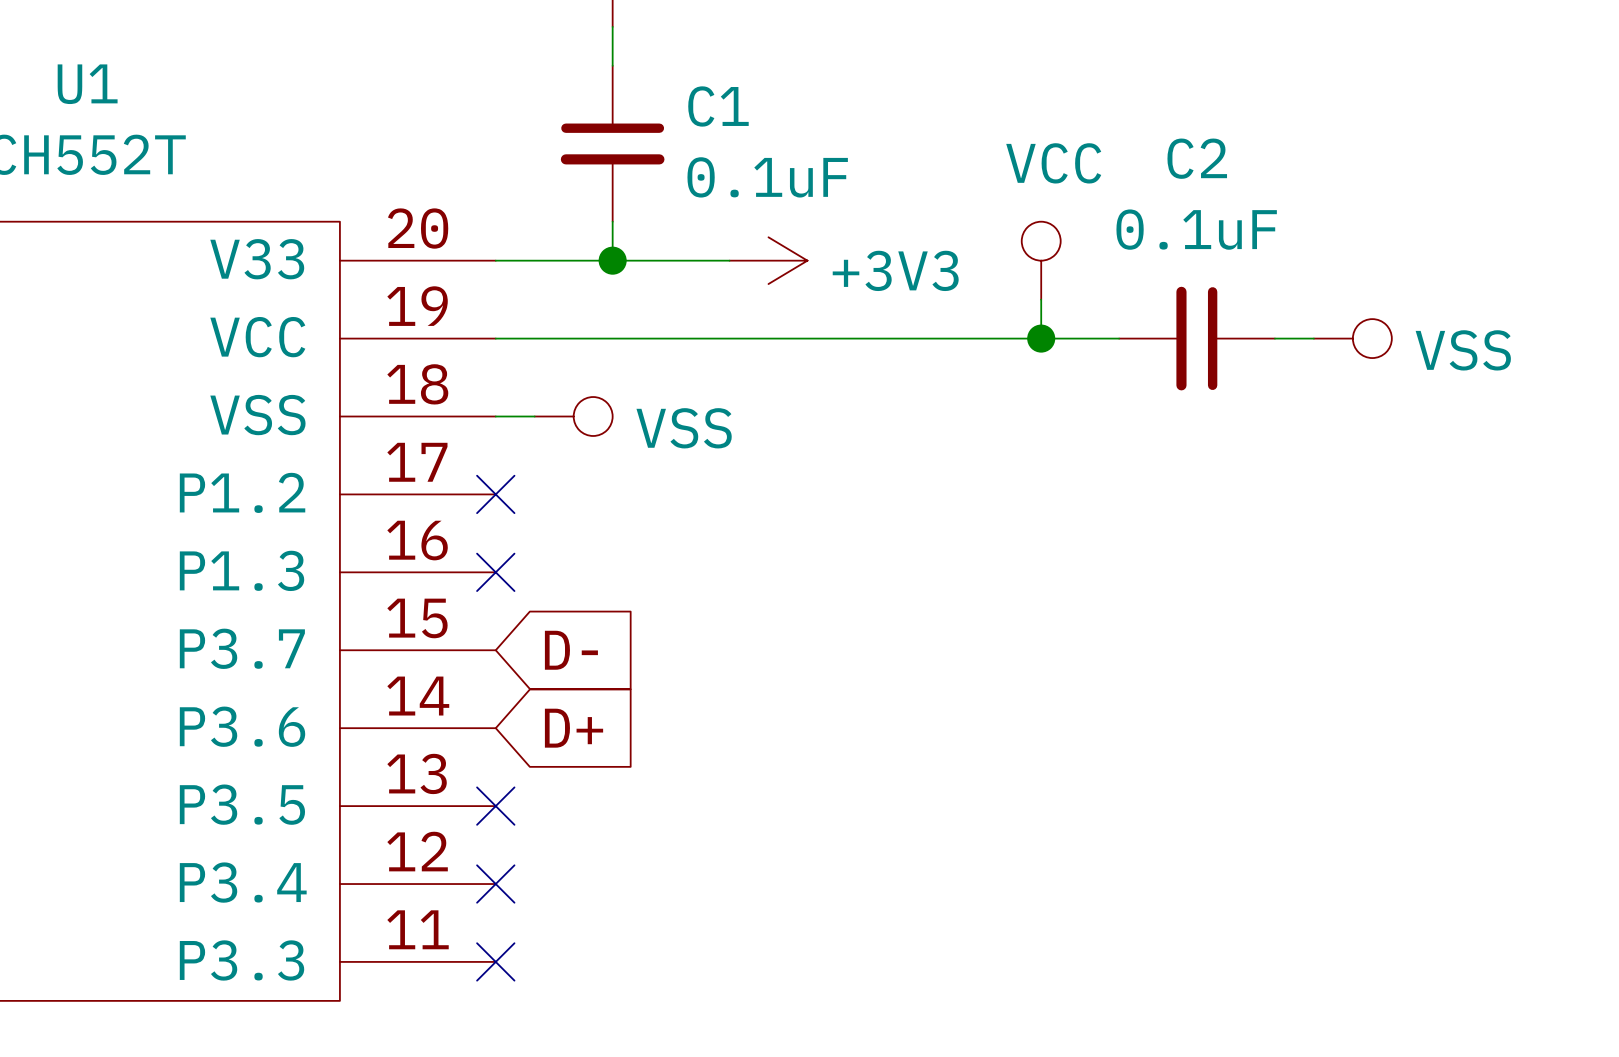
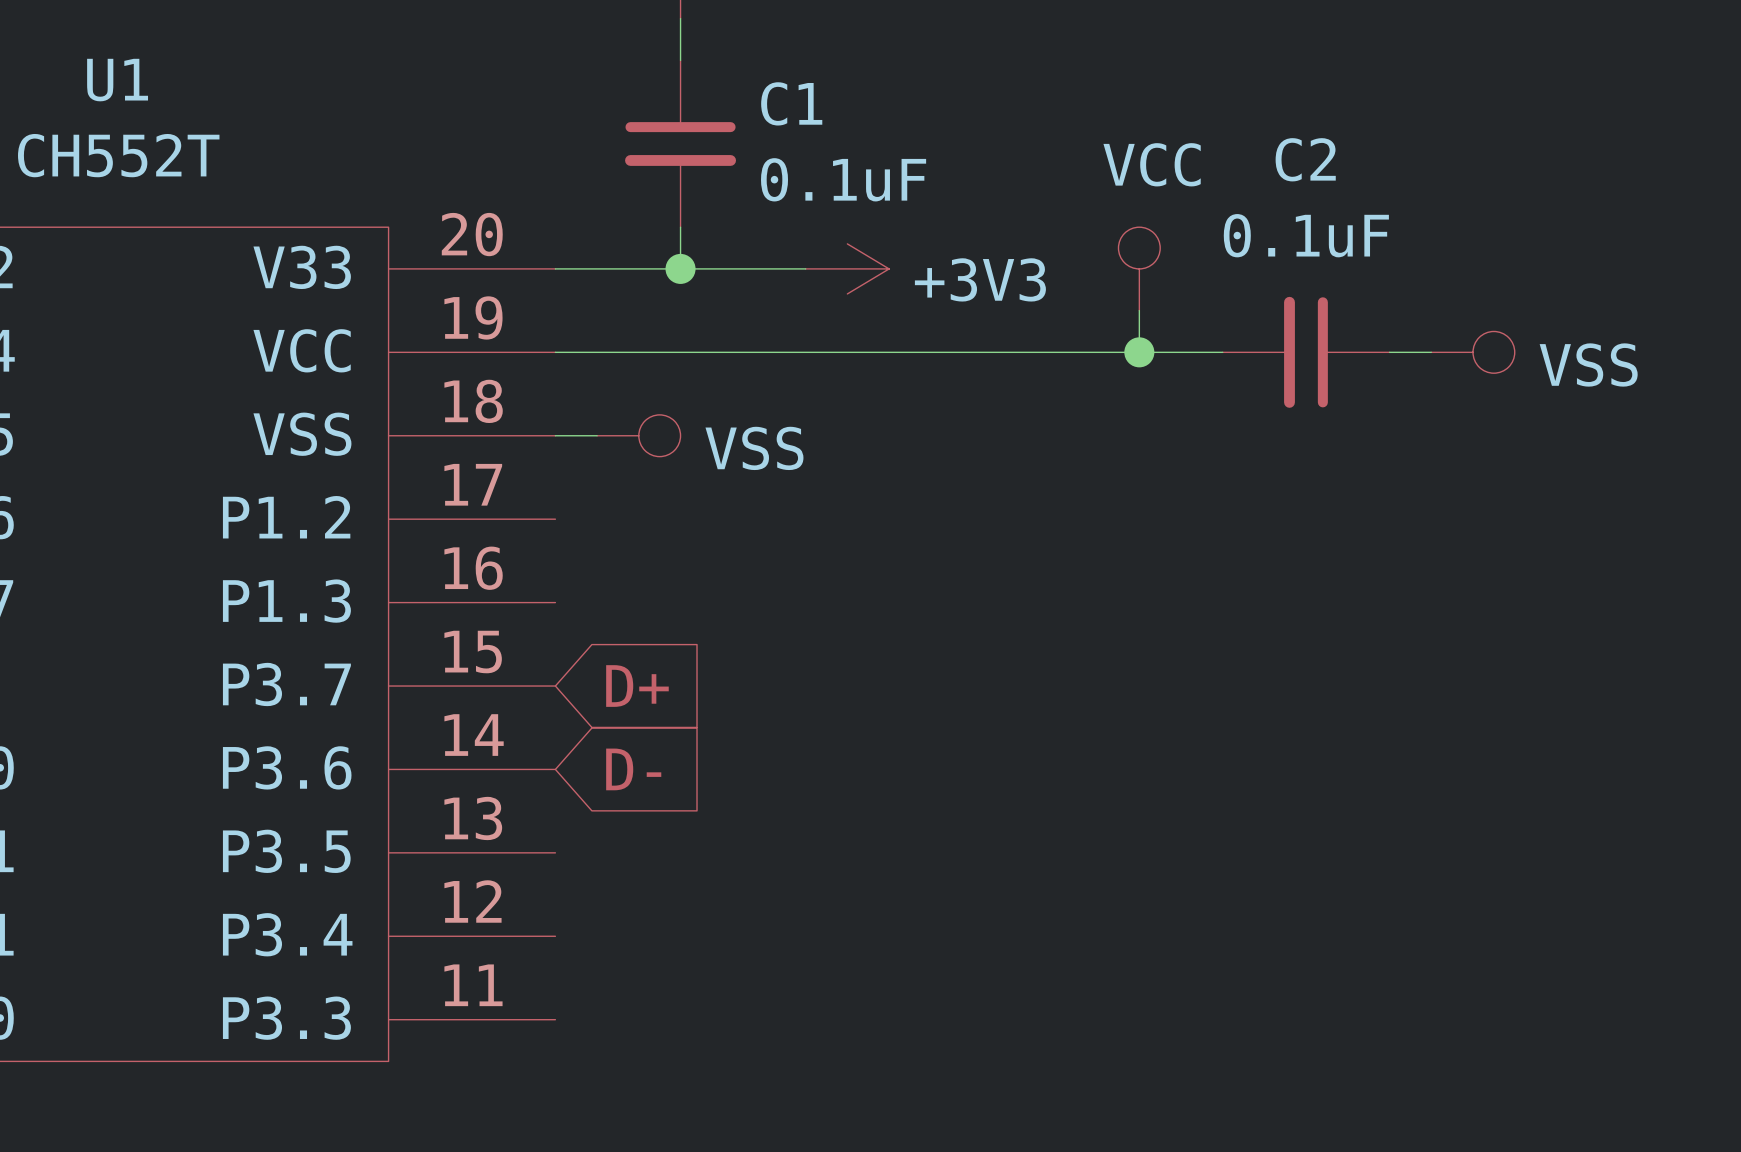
no-connect mark: (495, 494) -> none
no-connect mark: (495, 572) -> none
global label: D- (571, 650) -> D+ (637, 686)
global label: D+ (574, 728) -> D- (633, 769)
no-connect mark: (495, 806) -> none
no-connect mark: (495, 884) -> none
no-connect mark: (495, 961) -> none

